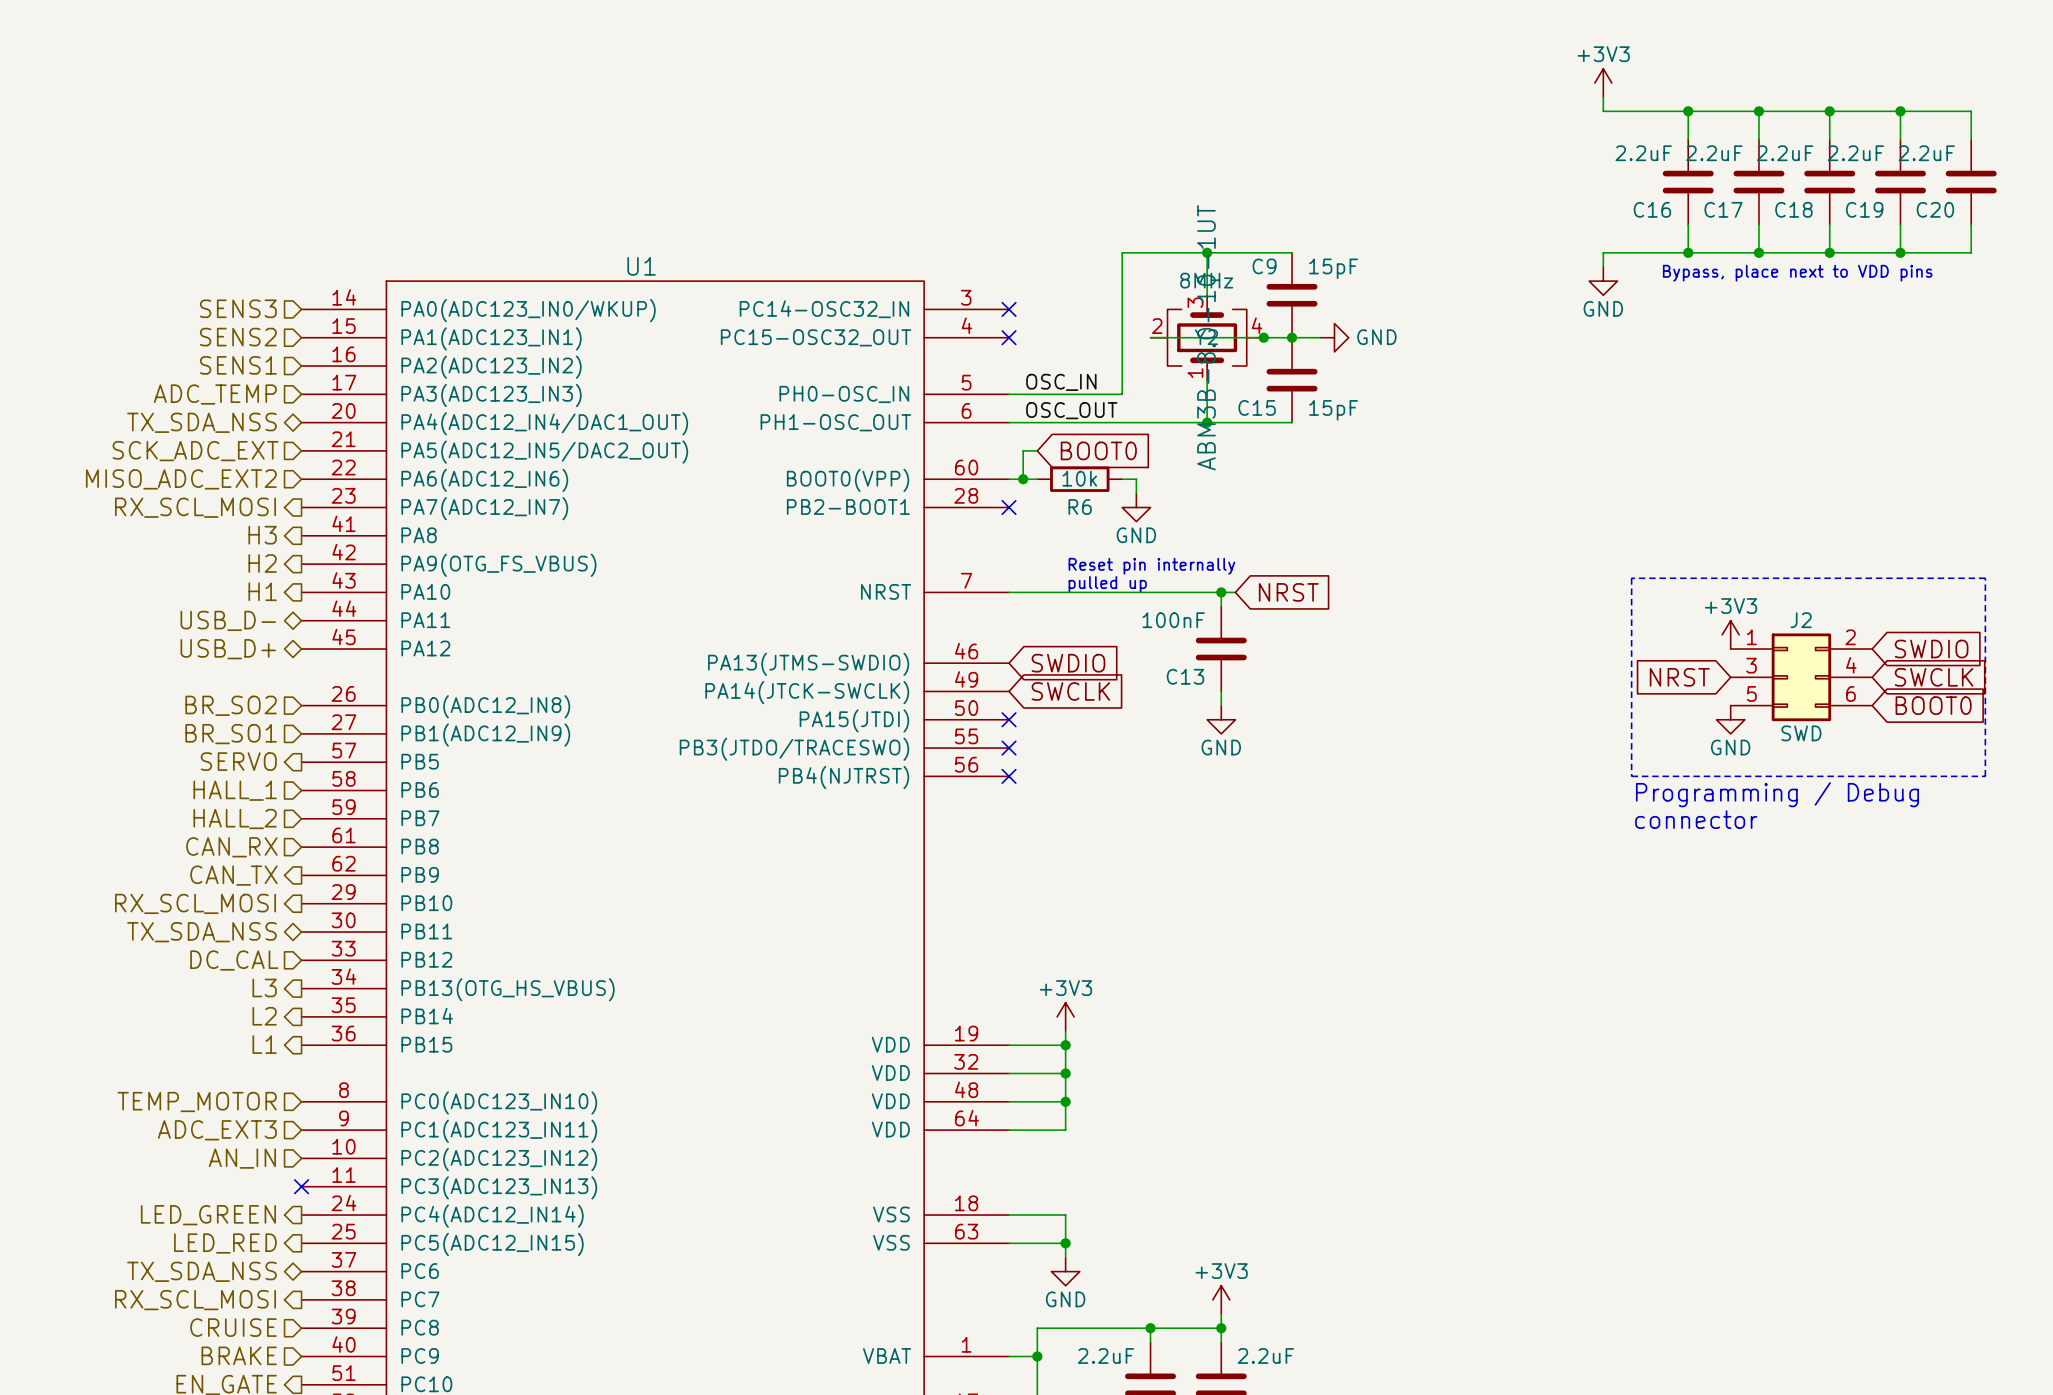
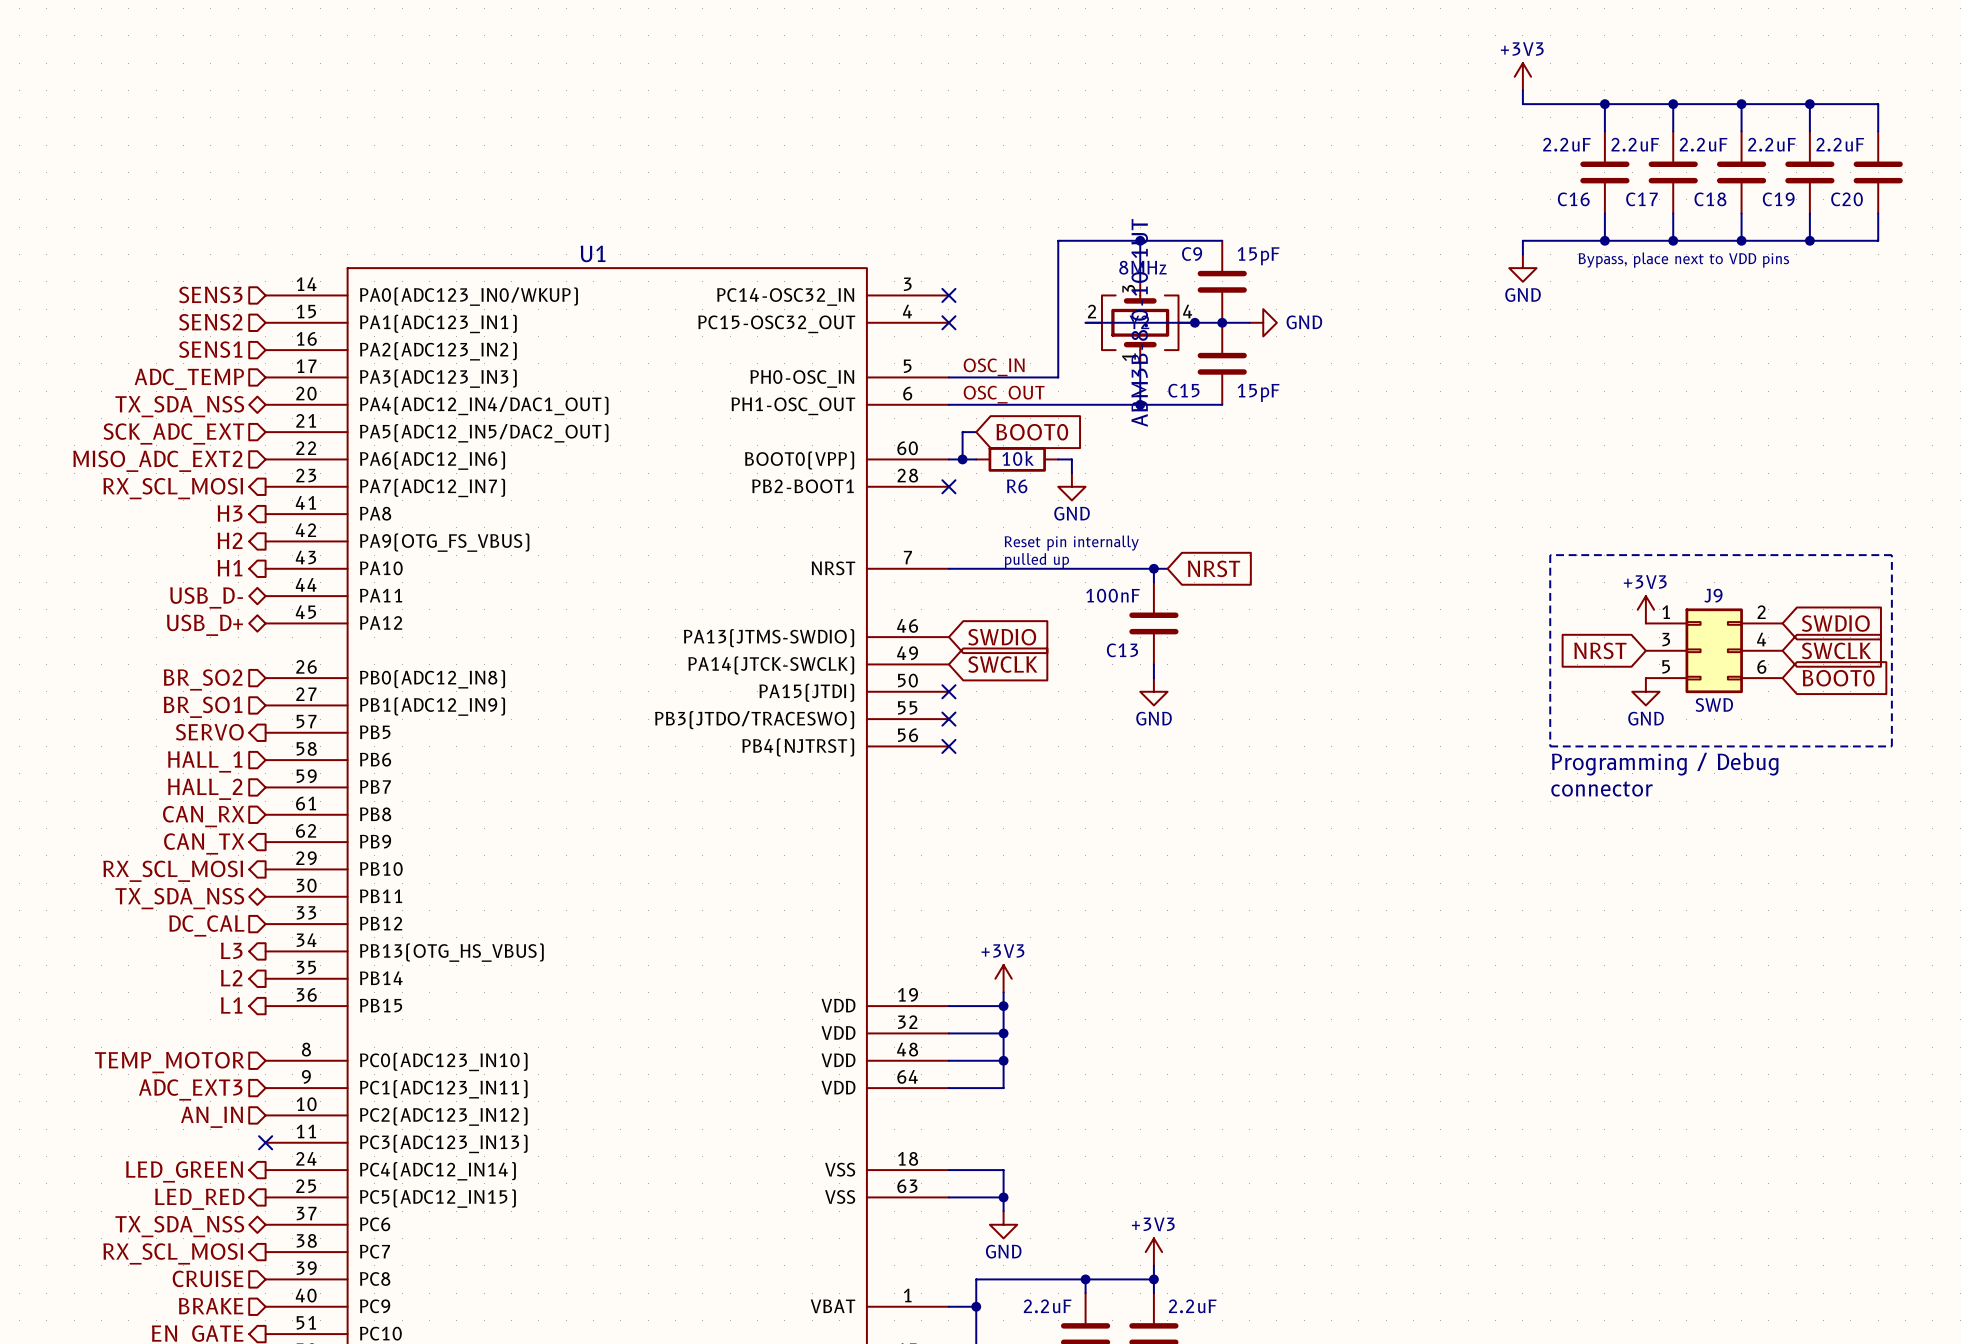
J2 name: J2 (1801, 620) -> J9 (1713, 595)

